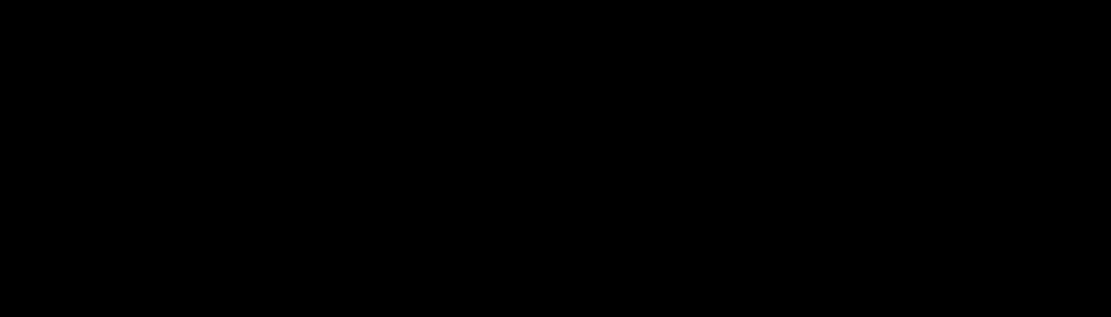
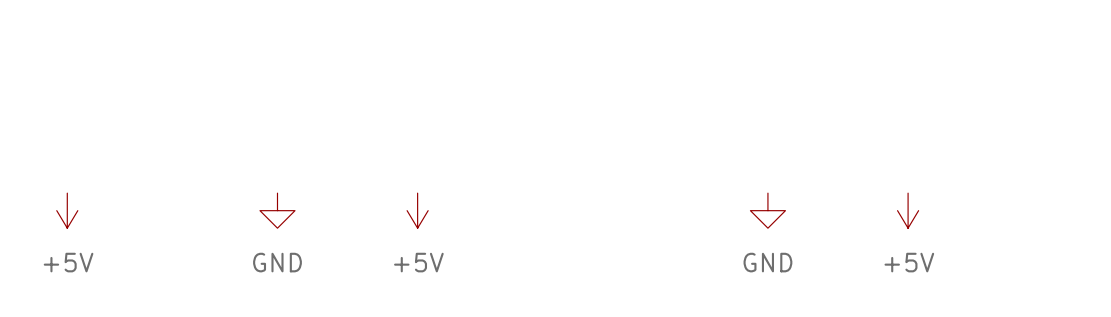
power symbol: none -> +5V (67, 210)
power symbol: none -> GND (277, 210)
power symbol: none -> +5V (417, 210)
power symbol: none -> GND (767, 210)
power symbol: none -> +5V (908, 210)

